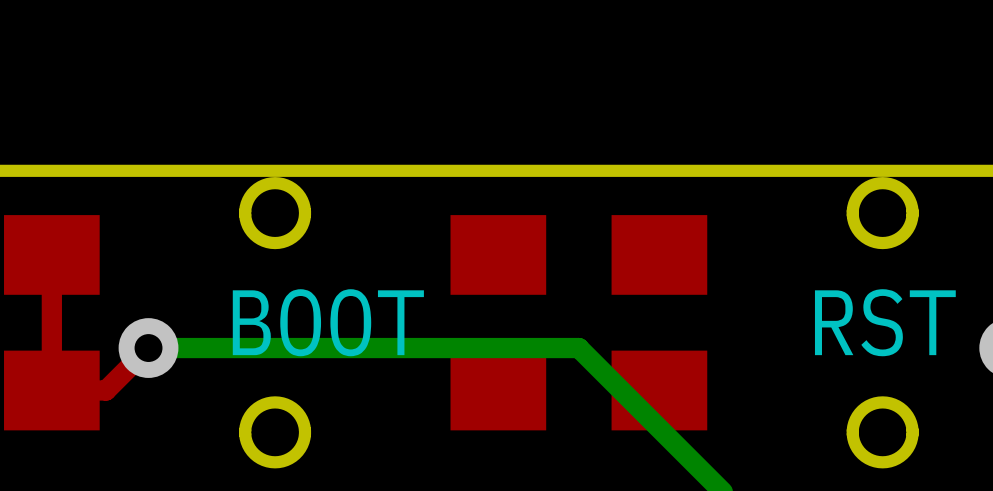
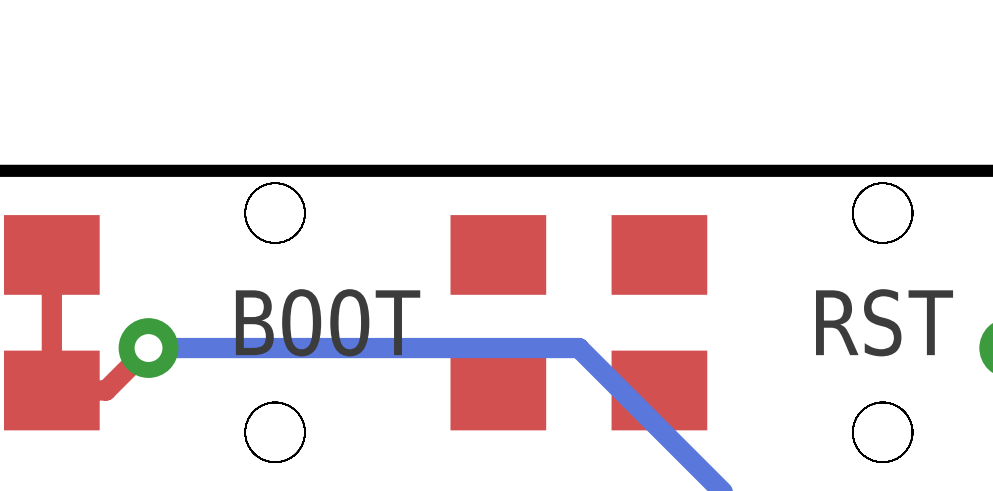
board edge: (305, 211) (303, 222) (298, 232) (289, 239) (278, 242) (267, 242) (257, 237) (249, 229) (245, 215) (246, 203) (252, 193) (260, 186) (271, 183) (282, 184) (292, 188) (300, 196) (305, 211) -> none
board edge: (912, 211) (911, 222) (905, 232) (897, 239) (886, 242) (875, 242) (865, 237) (857, 229) (852, 215) (854, 203) (859, 193) (868, 186) (878, 183) (890, 184) (900, 188) (907, 196) (912, 211) -> none
board edge: (305, 430) (303, 441) (298, 451) (289, 458) (278, 462) (267, 461) (257, 456) (249, 448) (245, 434) (246, 423) (252, 413) (260, 406) (271, 402) (282, 403) (292, 408) (300, 416) (305, 430) -> none
board edge: (912, 430) (911, 441) (905, 451) (897, 458) (886, 462) (875, 461) (865, 456) (857, 448) (852, 434) (854, 423) (859, 413) (868, 406) (878, 402) (890, 403) (900, 408) (907, 416) (912, 430) -> none

